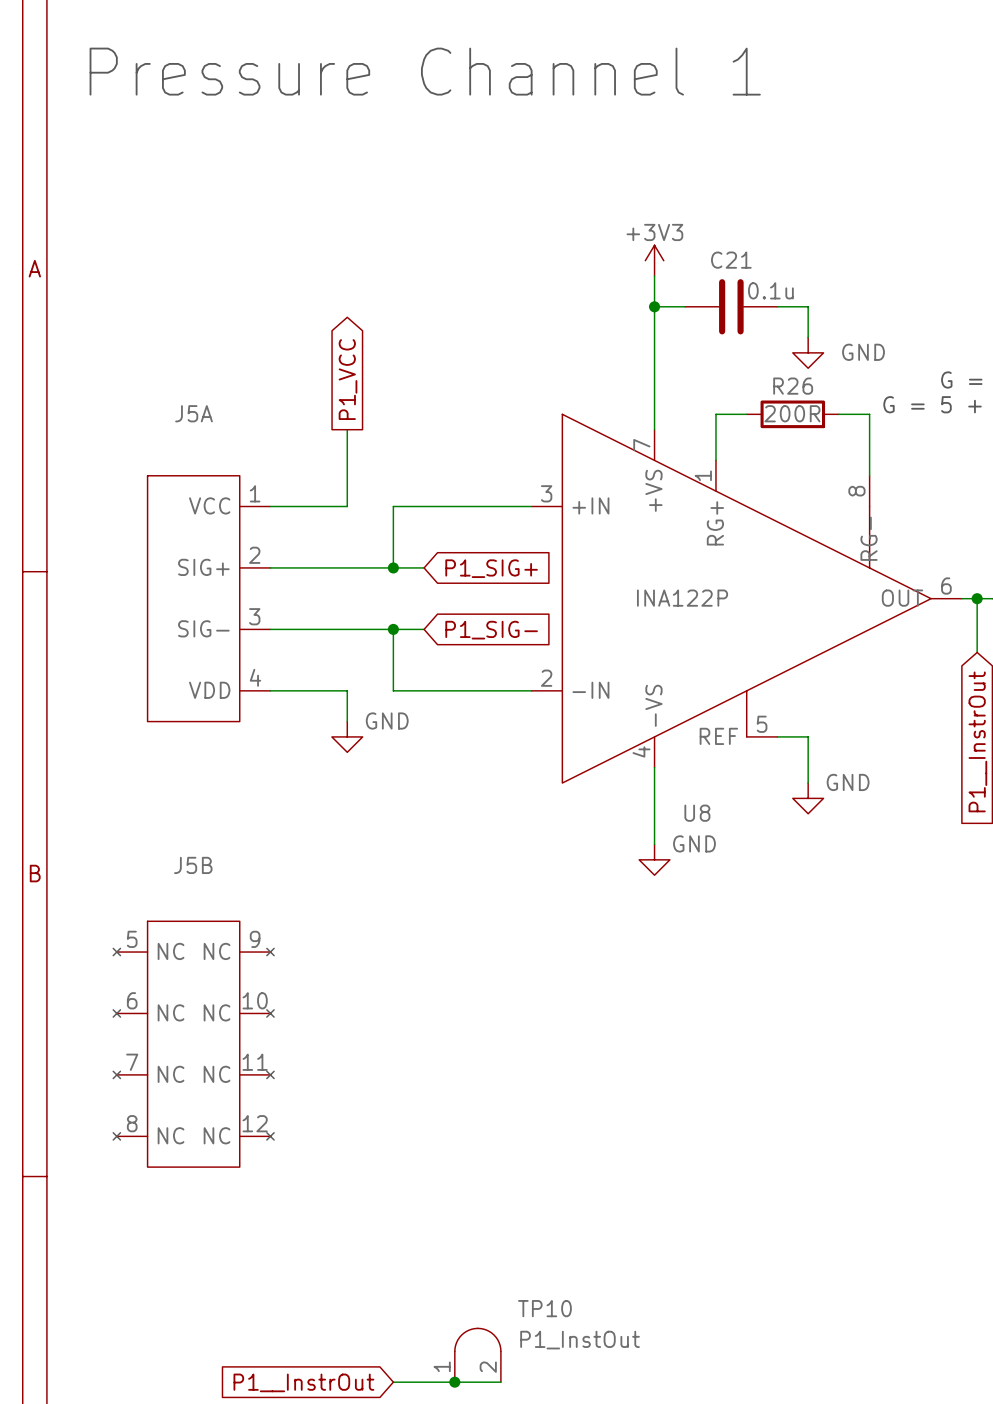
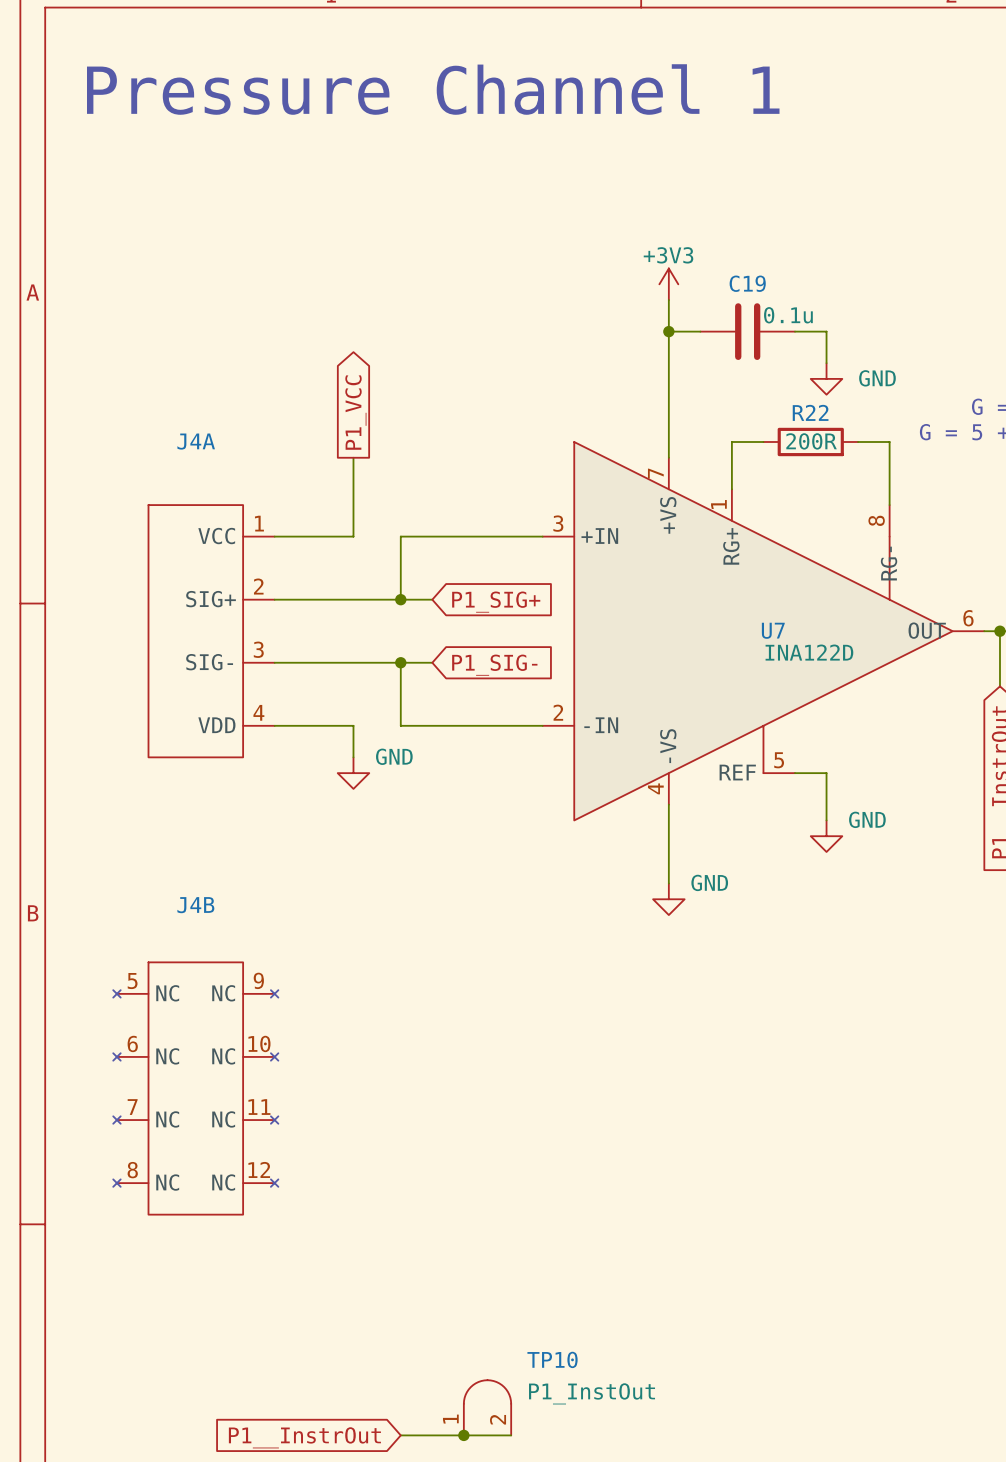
C21 name: C21 (731, 260) -> C19 (747, 283)
R26 name: R26 (793, 386) -> R22 (810, 412)
J5A name: J5A (194, 413) -> J4A (196, 441)
U8 value: INA122P (682, 598) -> INA122D (809, 652)
U8 name: U8 (697, 813) -> U7 (773, 630)
J5B name: J5B (193, 865) -> J4B (195, 905)

